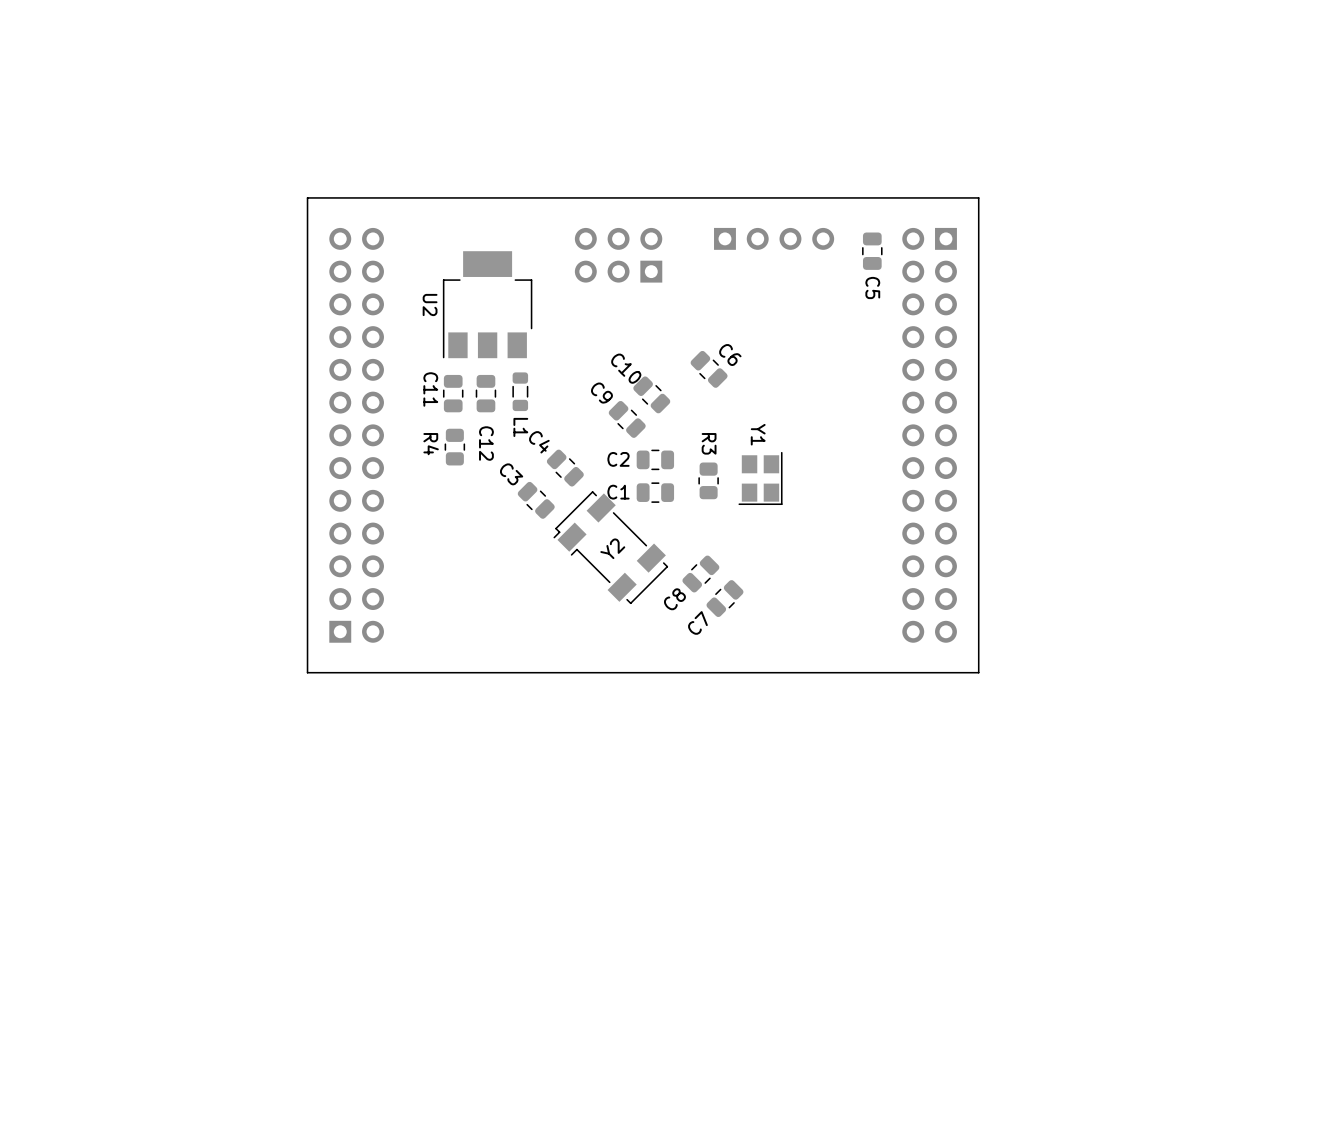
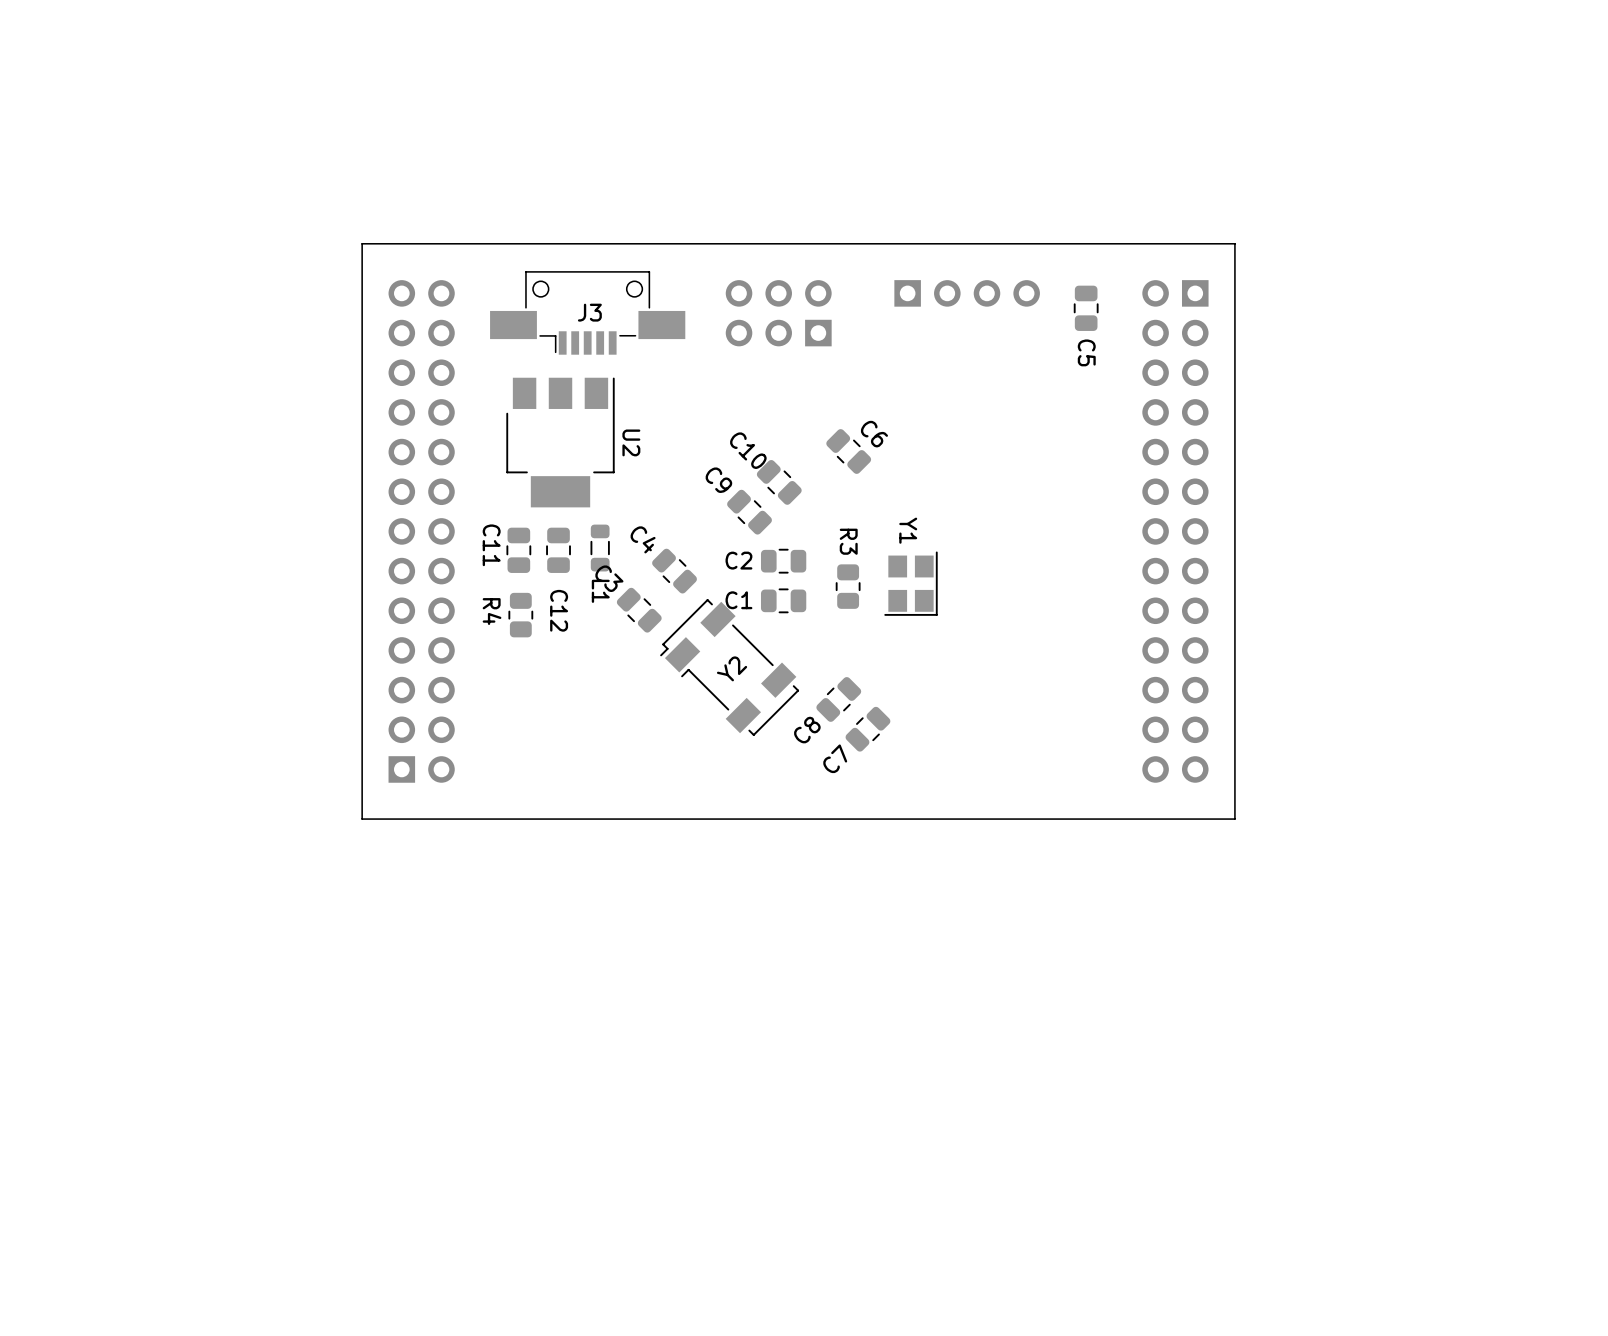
board edge: (978, 197) (978, 672) -> (1175, 243) (1234, 243) (1234, 819) (1175, 819)
part position: (774, 238) -> (967, 293)
C5 position: (872, 251) -> (1086, 308)
J3: none -> (587, 312)
part position: (618, 255) -> (778, 313)
U2 rotation: 0° (487, 304) -> 180° (560, 442)
L1 position: (520, 391) -> (600, 548)
C11 position: (453, 393) -> (518, 550)
C12 position: (485, 393) -> (558, 550)
part position: (929, 435) -> (1175, 531)
R4 position: (454, 447) -> (520, 615)

